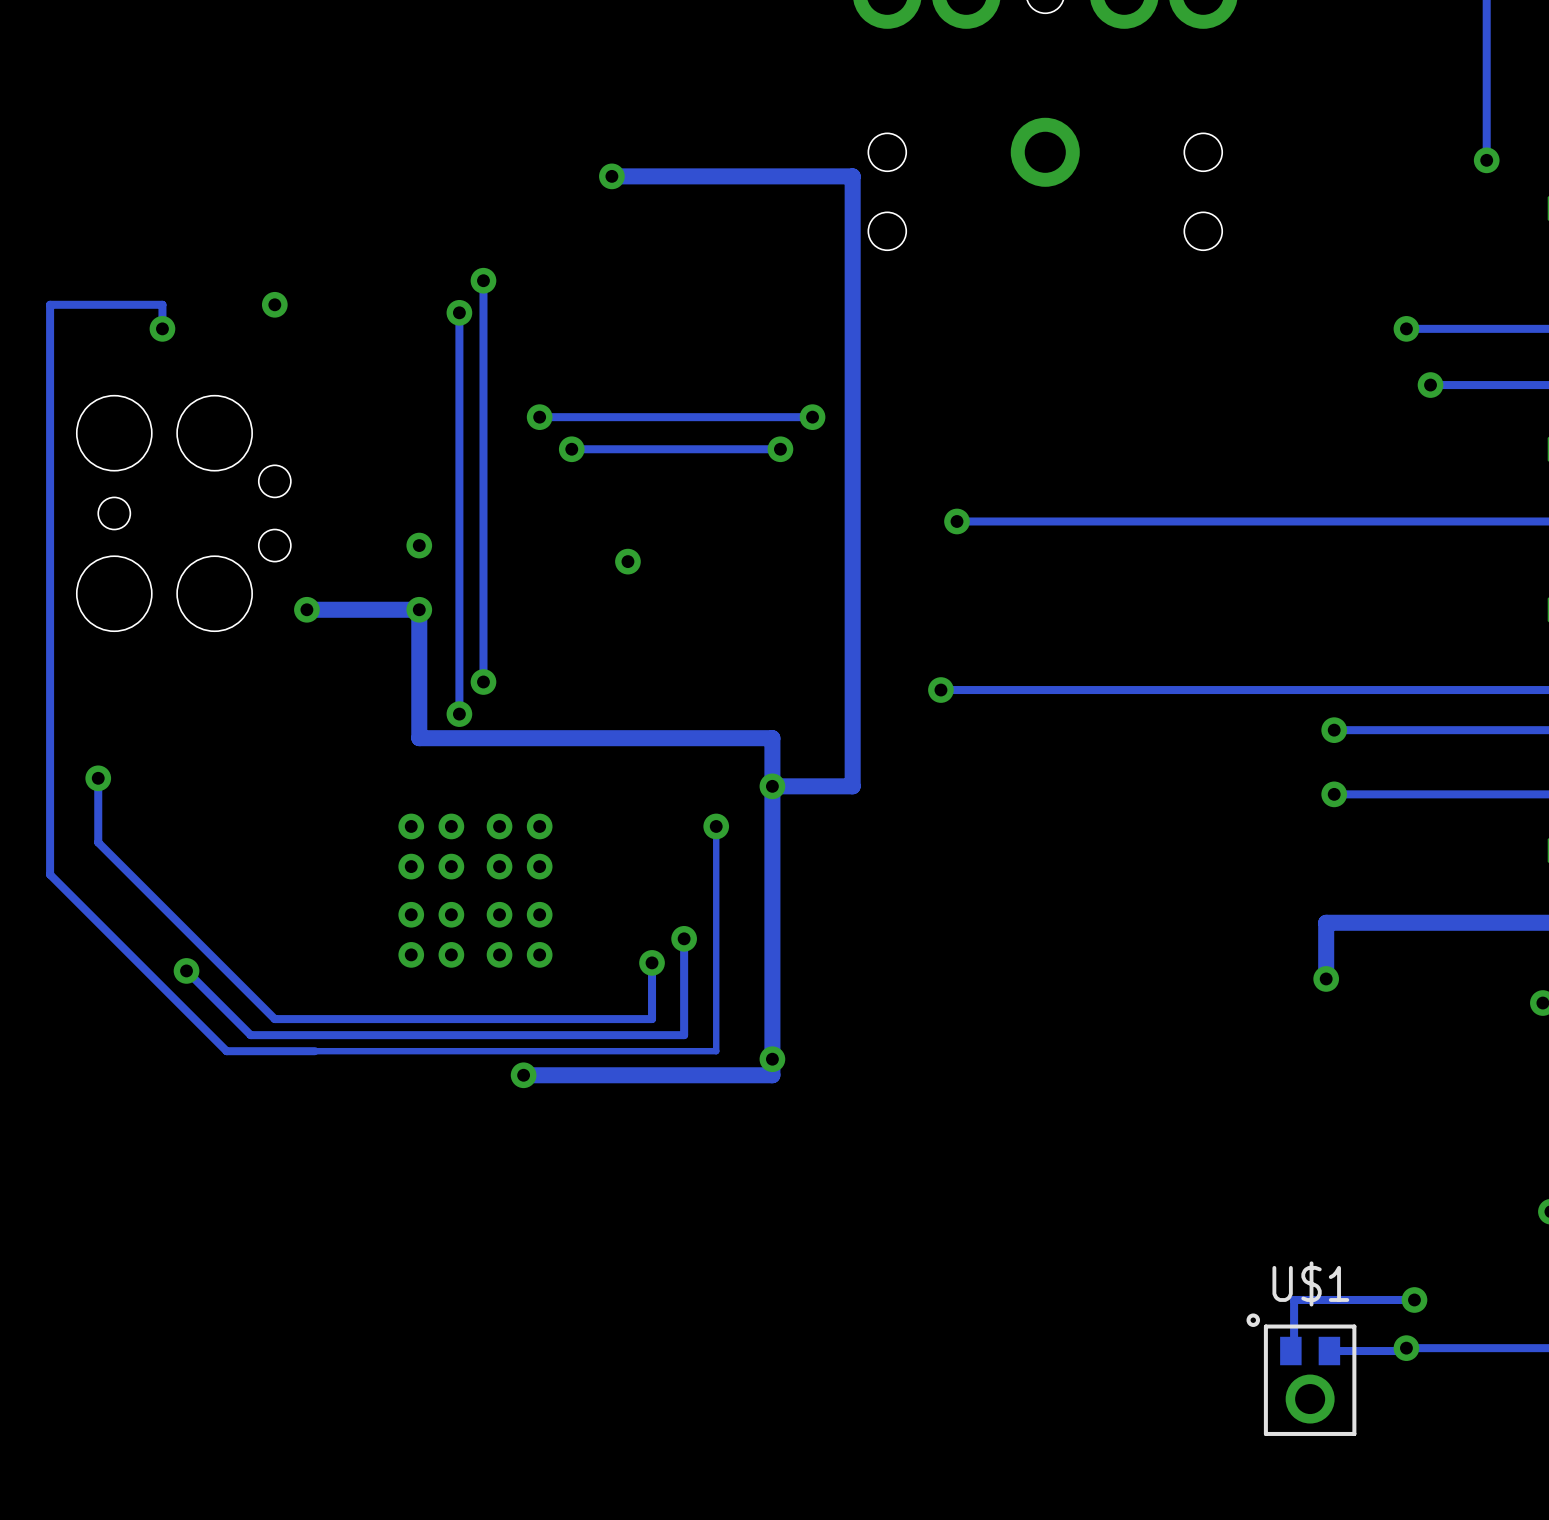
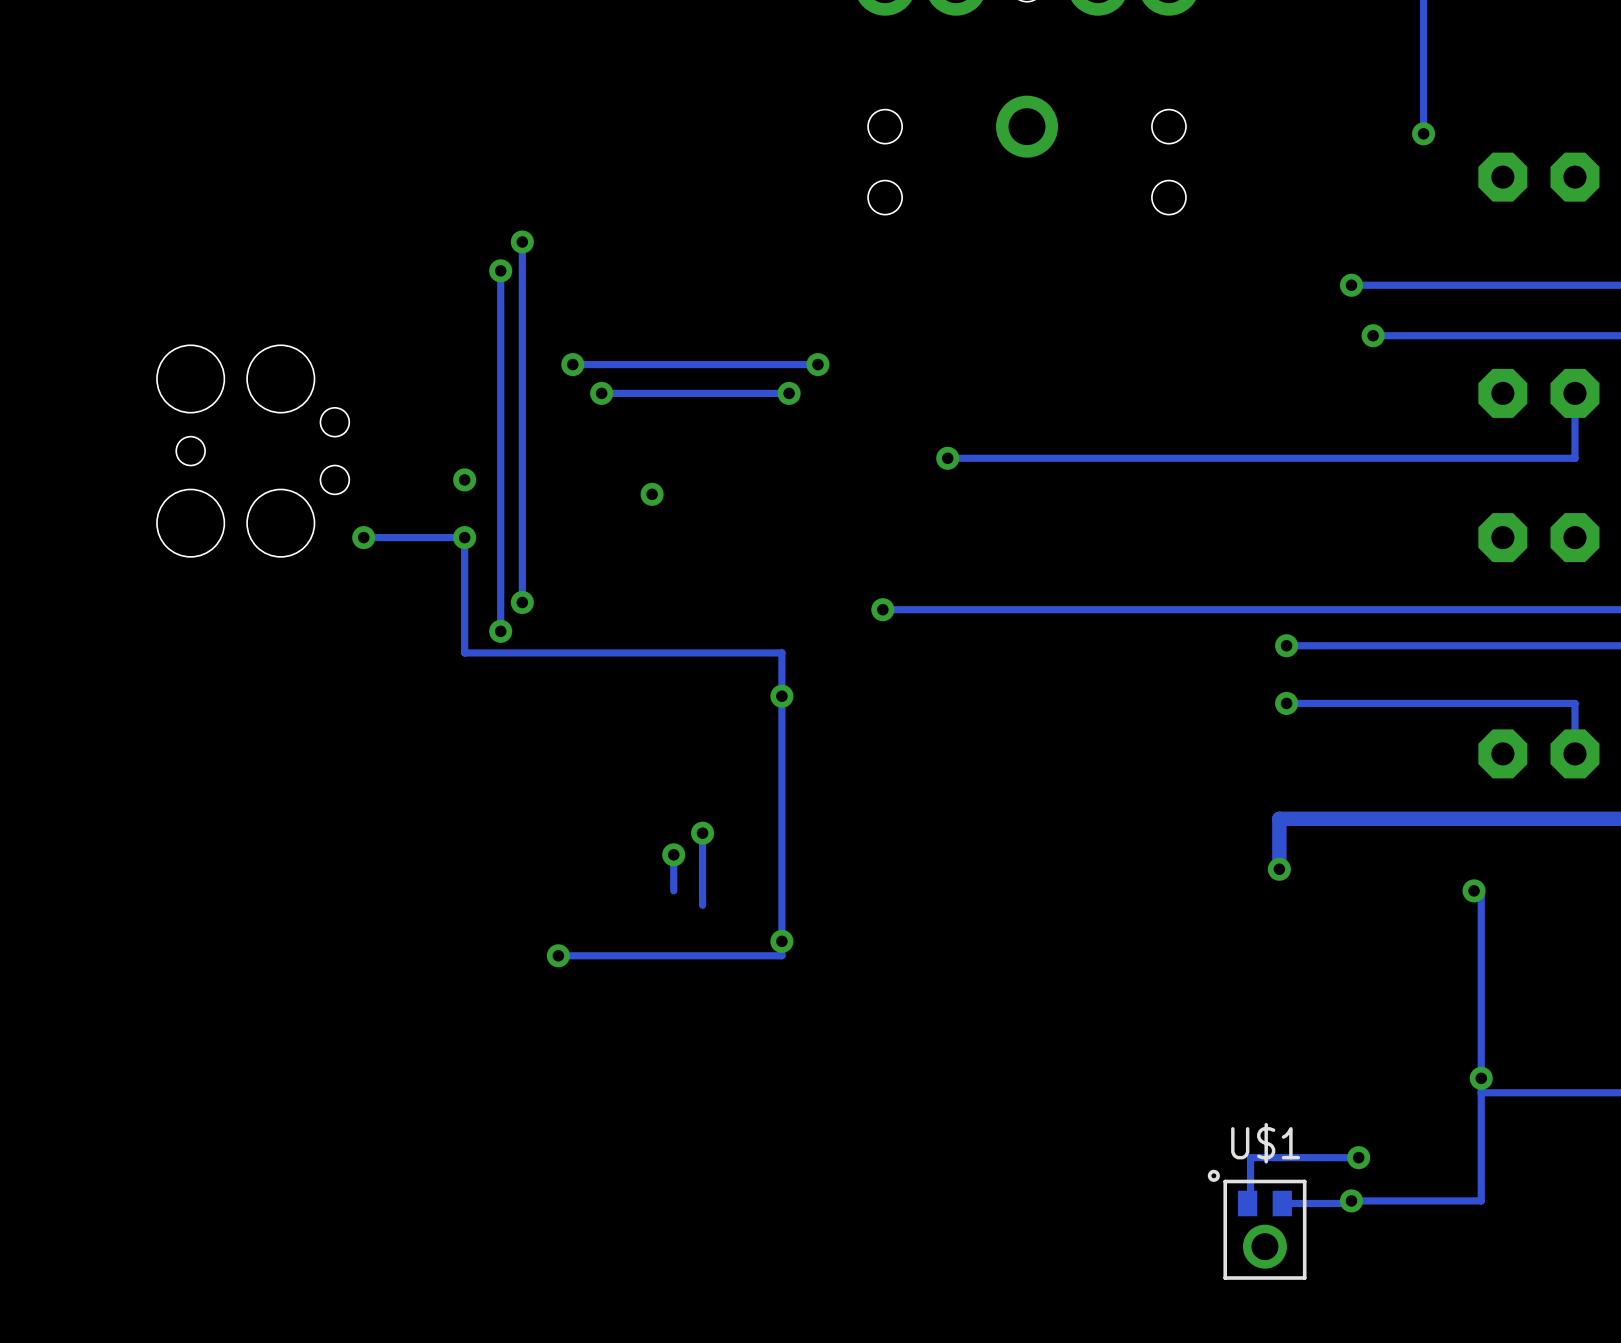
track: (611, 176) (852, 176) (852, 786) (772, 786) -> none
via: (611, 176) -> none
via: (274, 304) -> none
track: (162, 328) (162, 304) (50, 304) (50, 874) (226, 1051) (716, 1051) (716, 826) -> none
via: (162, 328) -> none
track width: thick (306, 609) (419, 609) (419, 738) (772, 738) (772, 1075) (523, 1075) -> thin (363, 537) (464, 537) (464, 652) (781, 652) (781, 955) (558, 955)
track: none -> (933, 609) (882, 609)
via position: (940, 690) -> (882, 609)
track: (98, 778) (98, 842) (274, 1019) (652, 1019) (652, 1003) -> none
via: (98, 778) -> none
via: (411, 826) -> none
via: (451, 826) -> none
via: (499, 826) -> none
via: (539, 826) -> none
via: (716, 826) -> none
via: (411, 866) -> none
via: (451, 866) -> none
via: (499, 866) -> none
via: (539, 866) -> none
via: (411, 914) -> none
via: (451, 914) -> none
via: (499, 914) -> none
via: (539, 914) -> none
via: (411, 954) -> none
via: (451, 954) -> none
via: (499, 954) -> none
via: (539, 954) -> none
track: (186, 970) (250, 1035) (684, 1035) (684, 1019) -> none
via: (186, 970) -> none

